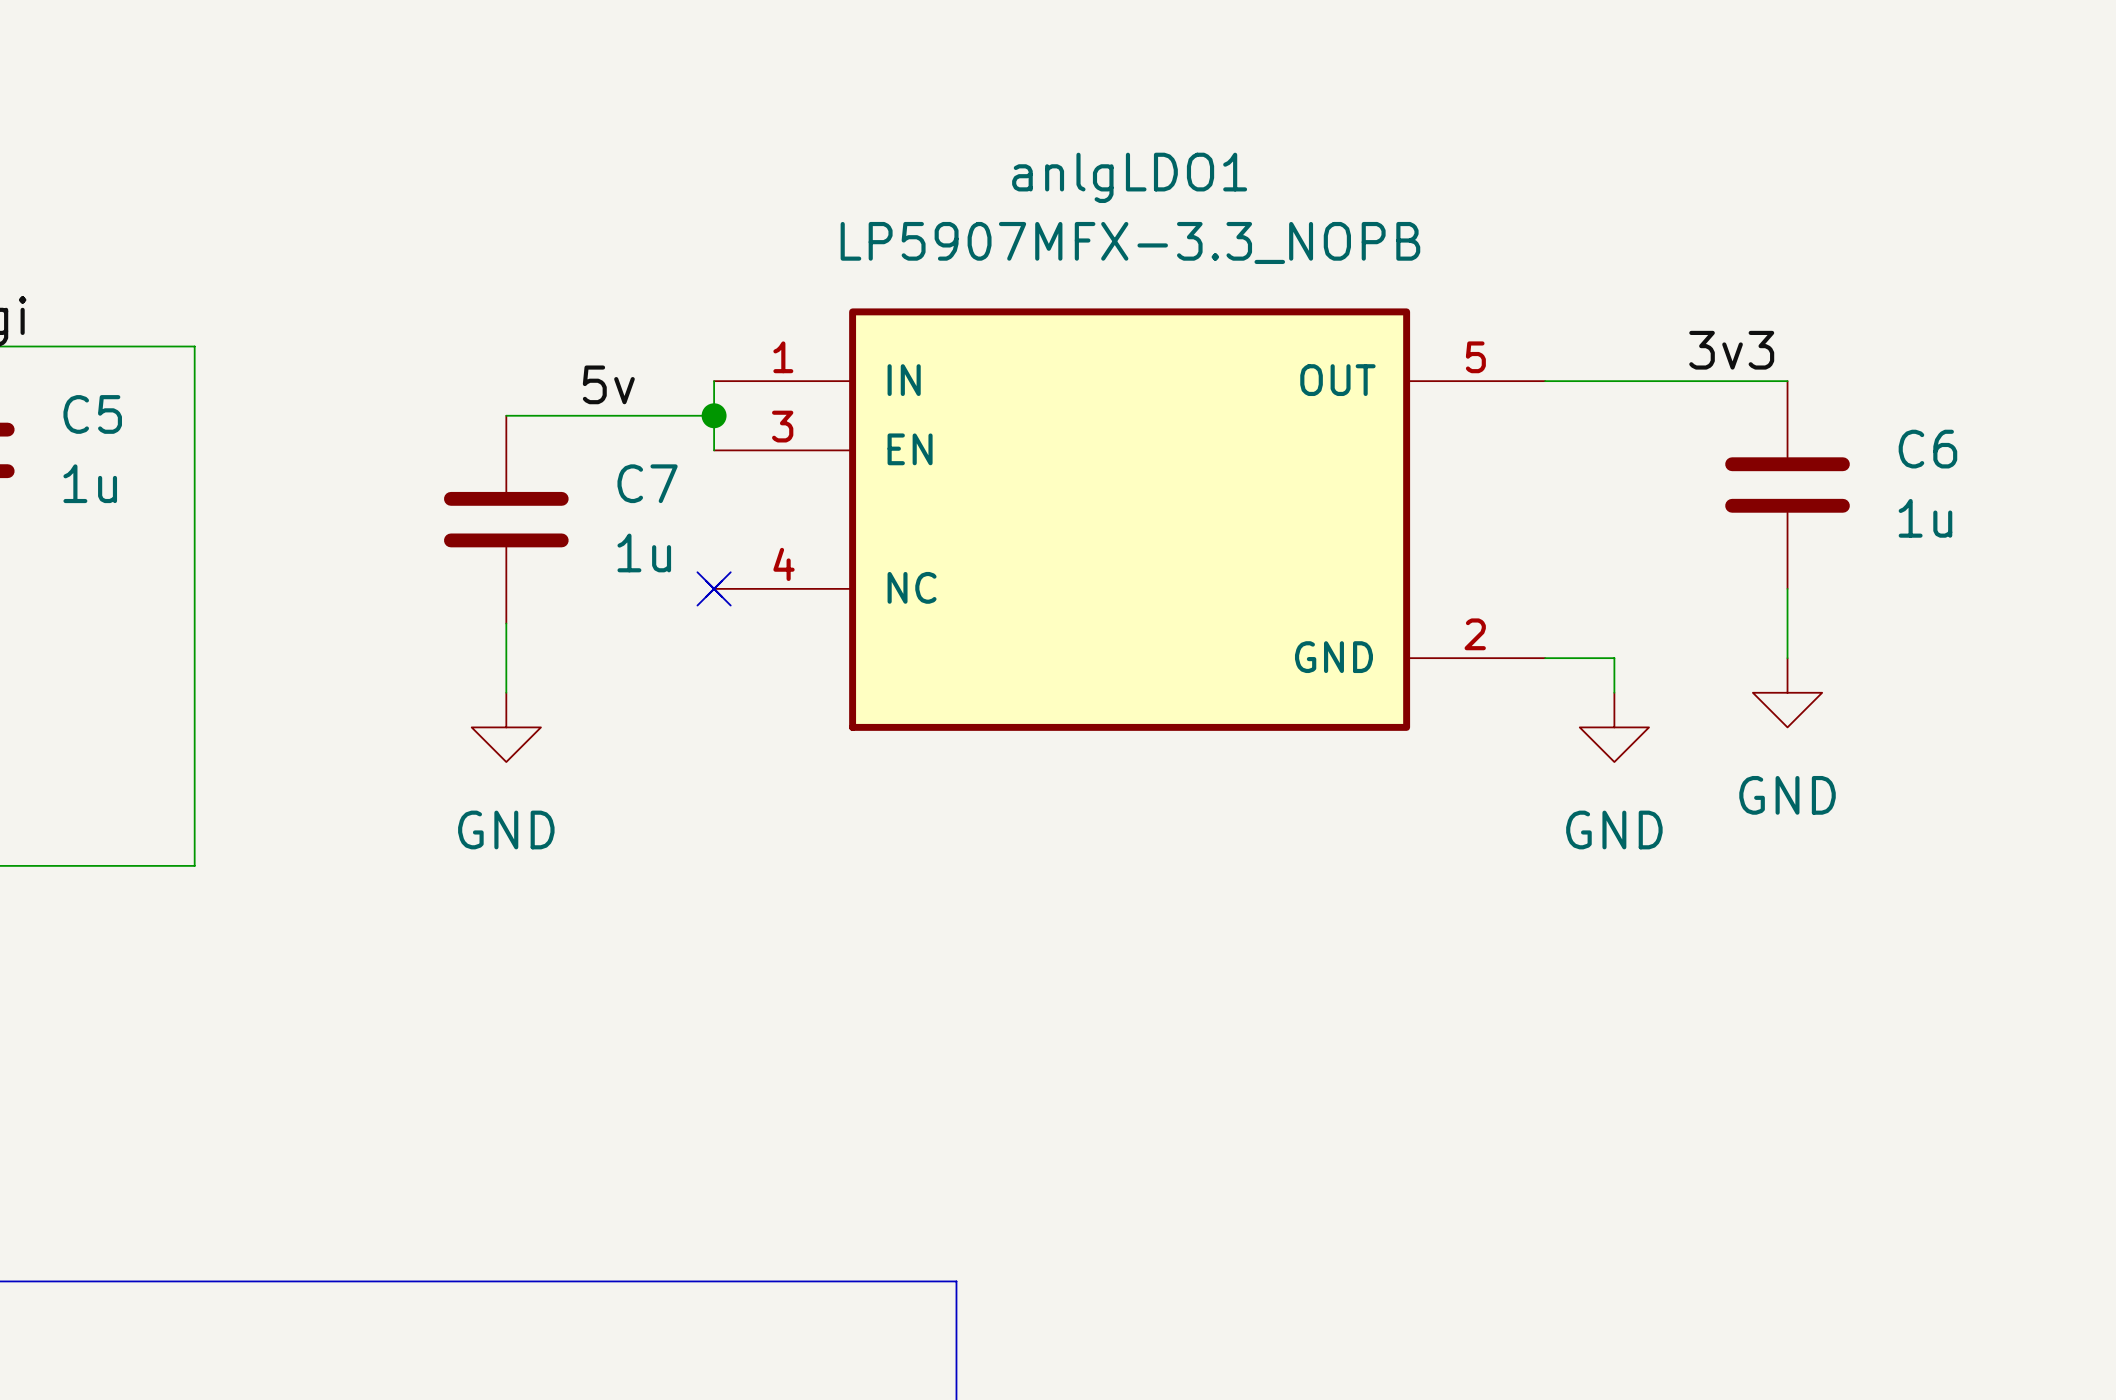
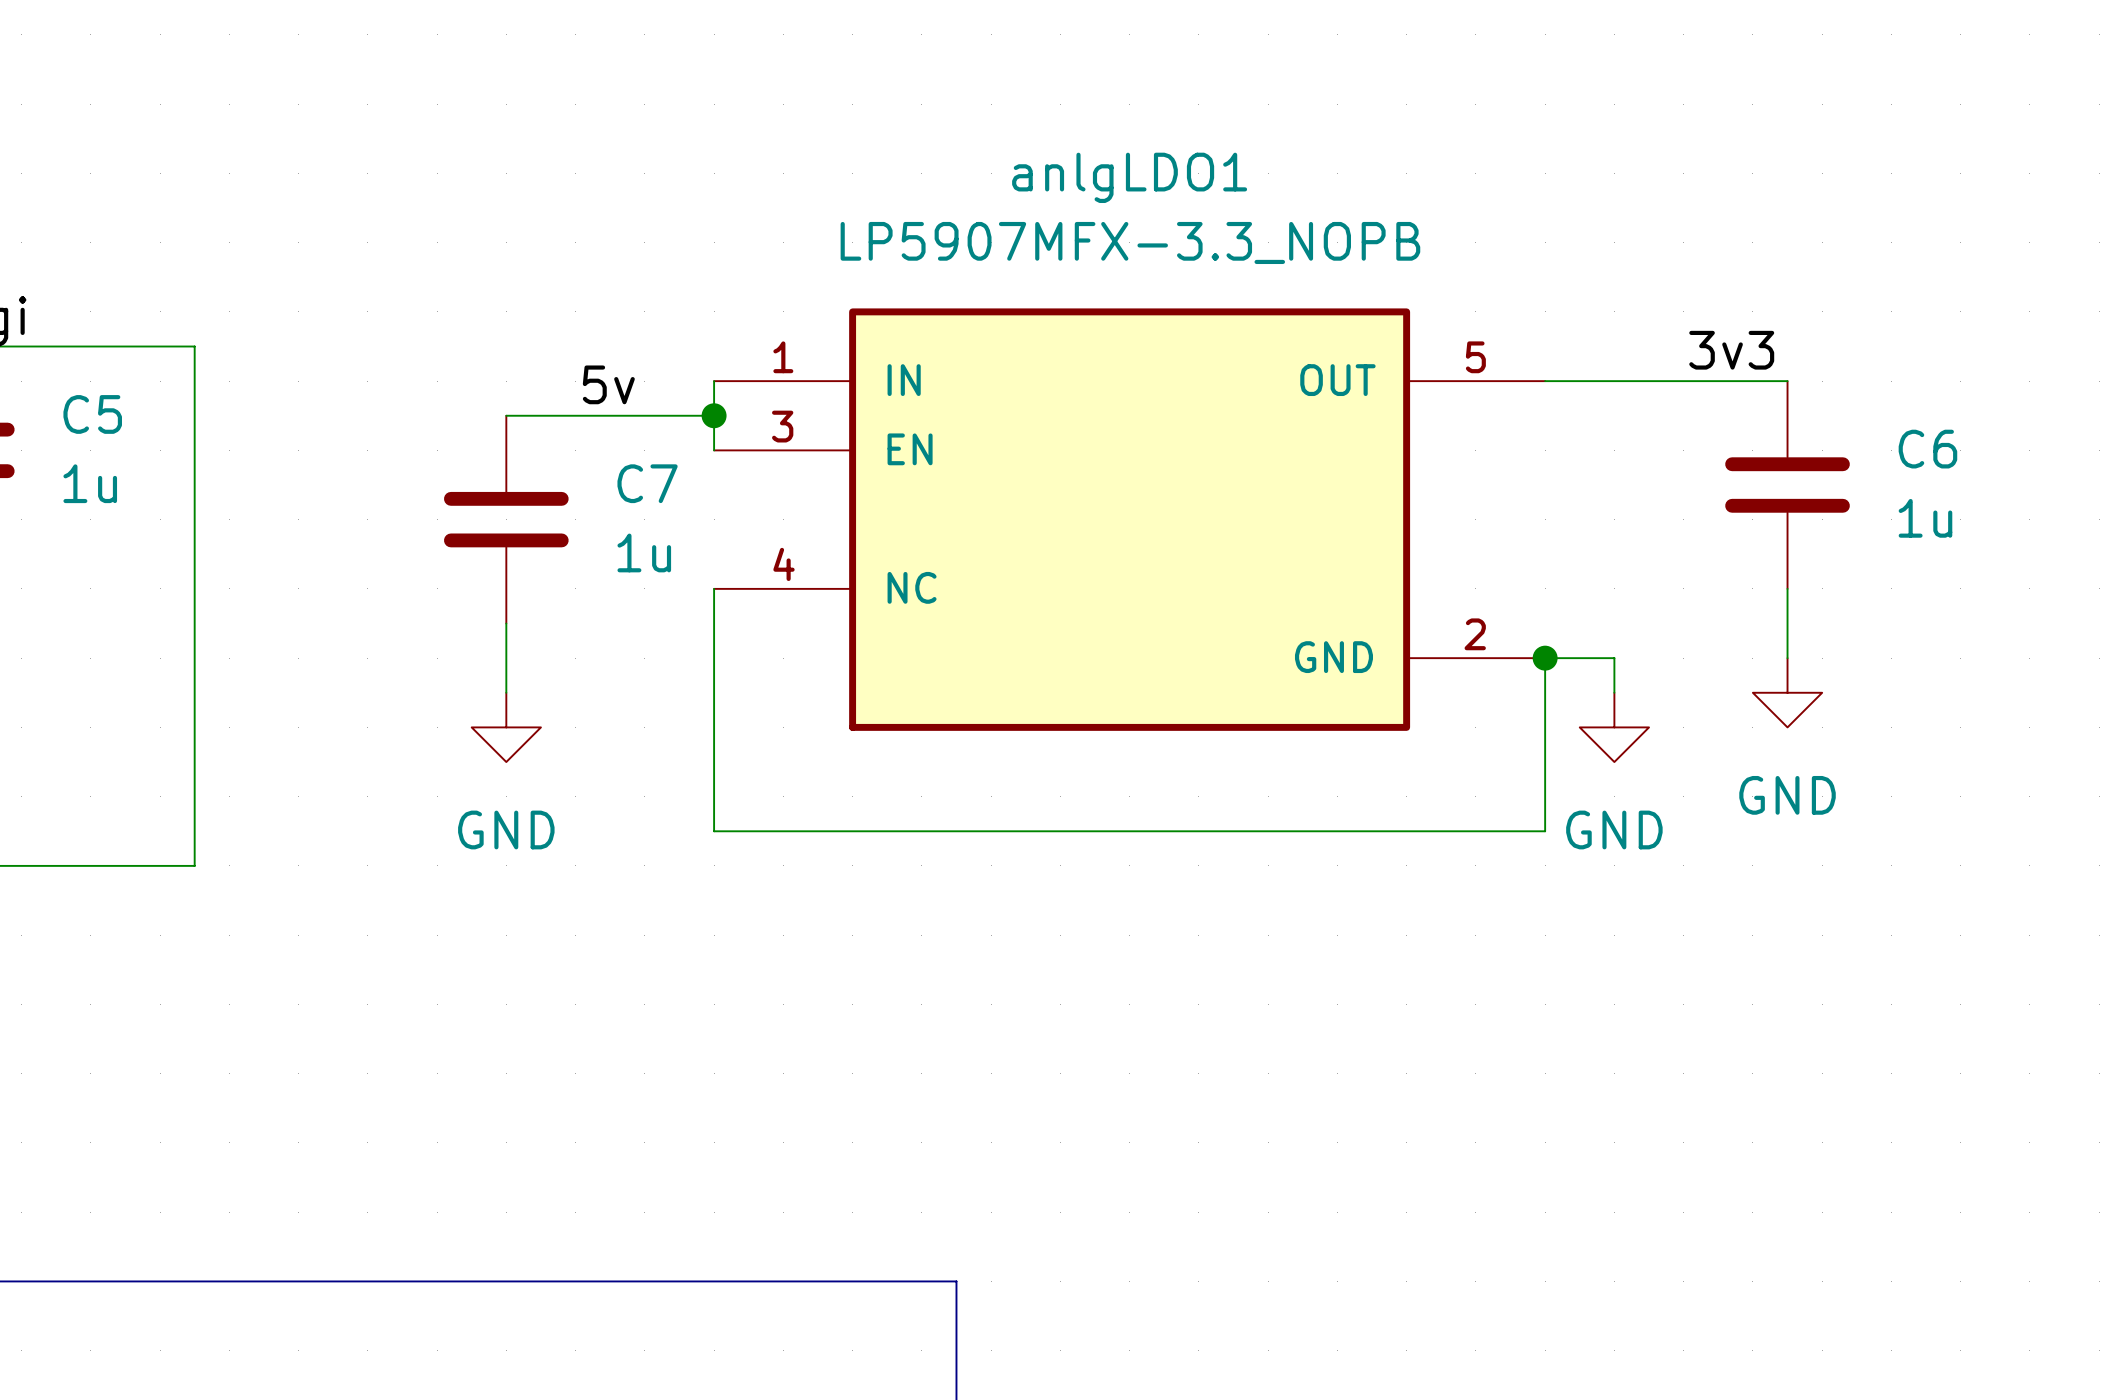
anlgLDO1 symbol: [705, 308, 1546, 731] -> [714, 308, 1546, 731]
wire: none -> (714, 588) (714, 831) (1545, 831) (1545, 658)
no-connect mark: (714, 588) -> none
junction: none -> (1545, 658)

